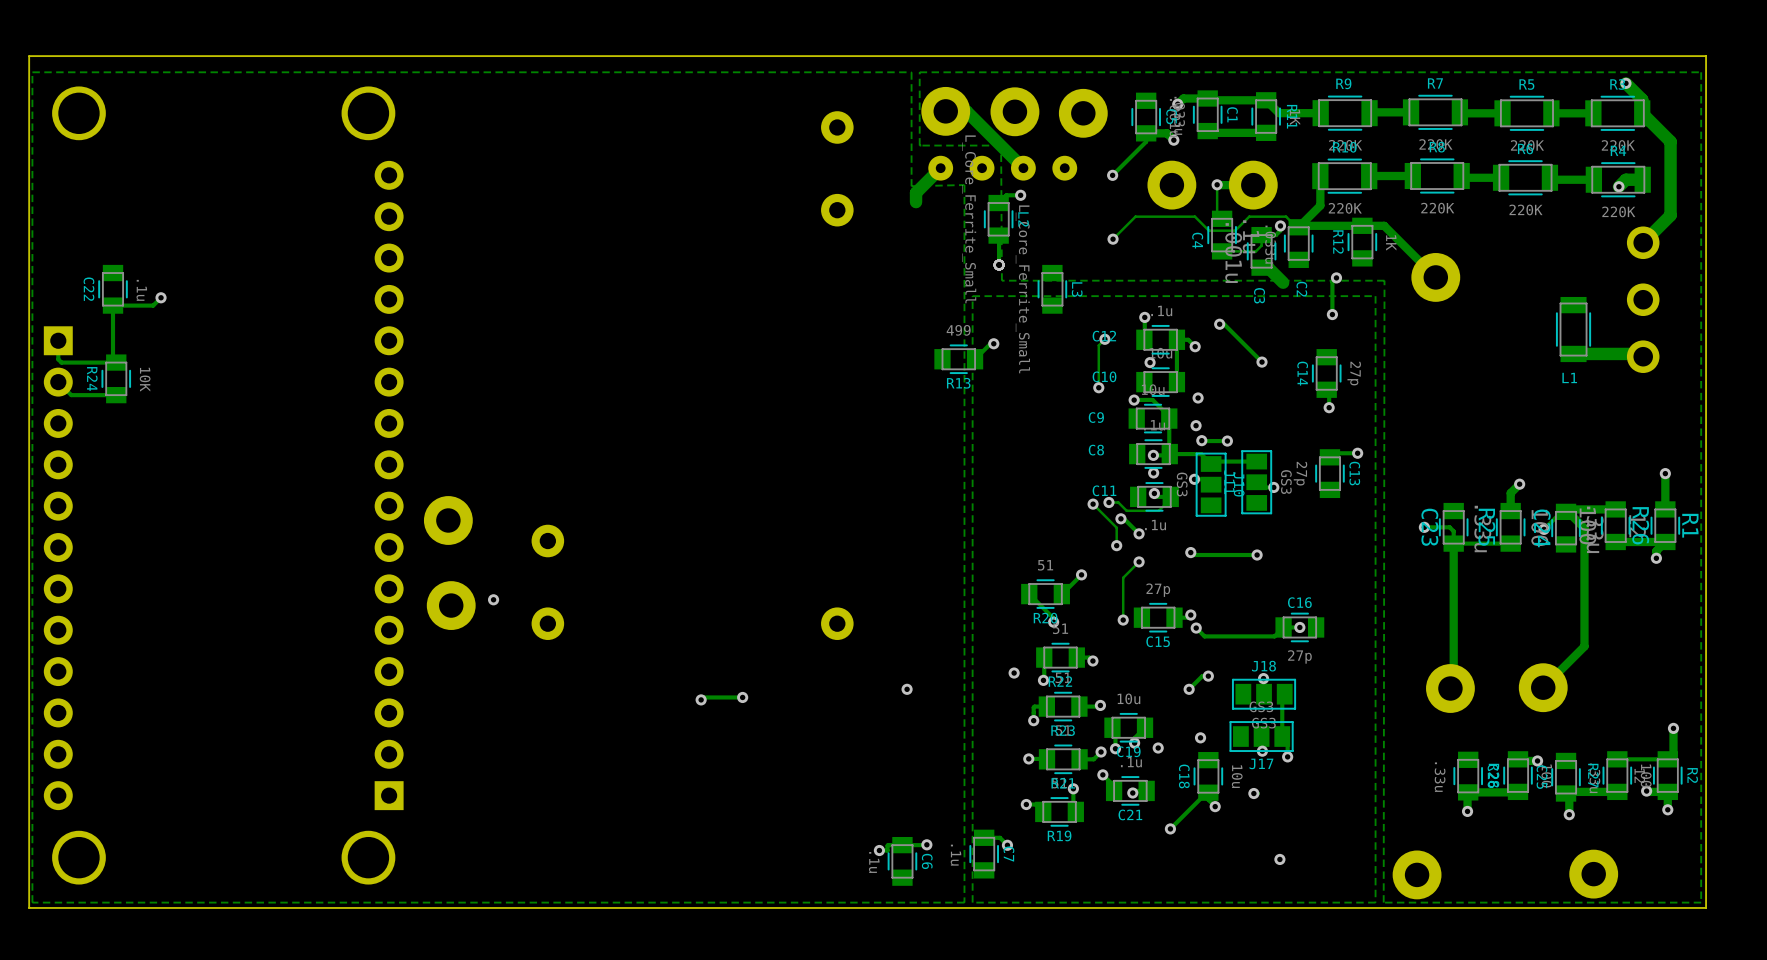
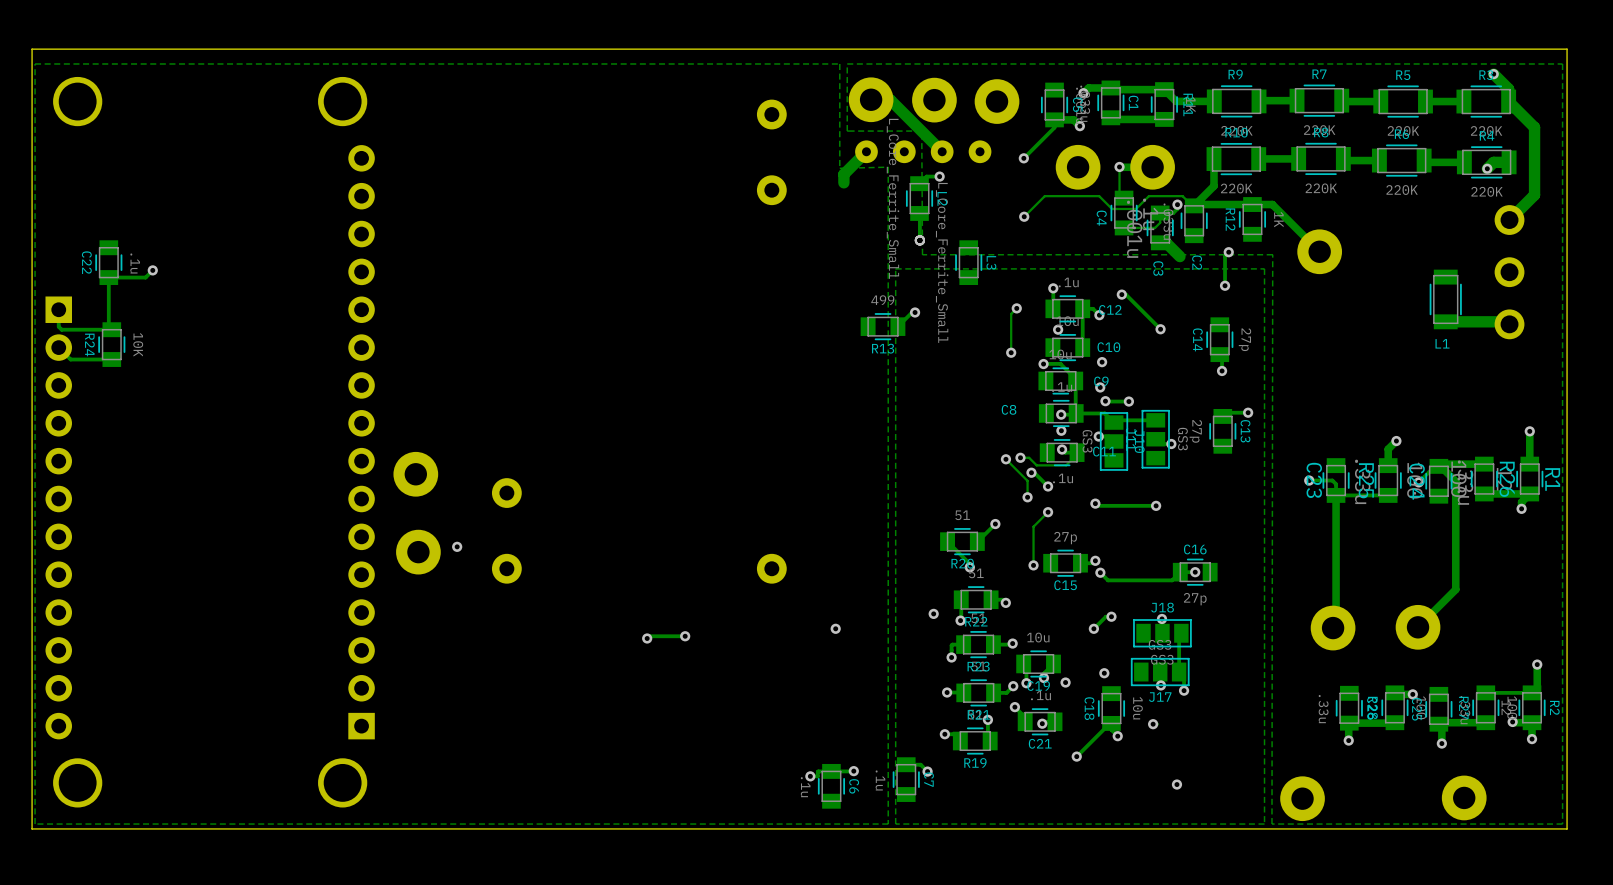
C12 name position: C12 (1104, 336) -> C12 (1110, 309)
C10 name position: C10 (1104, 376) -> C10 (1108, 347)
C9 name position: C9 (1096, 417) -> C9 (1101, 381)
C11 name position: C11 (1104, 490) -> C11 (1104, 451)

